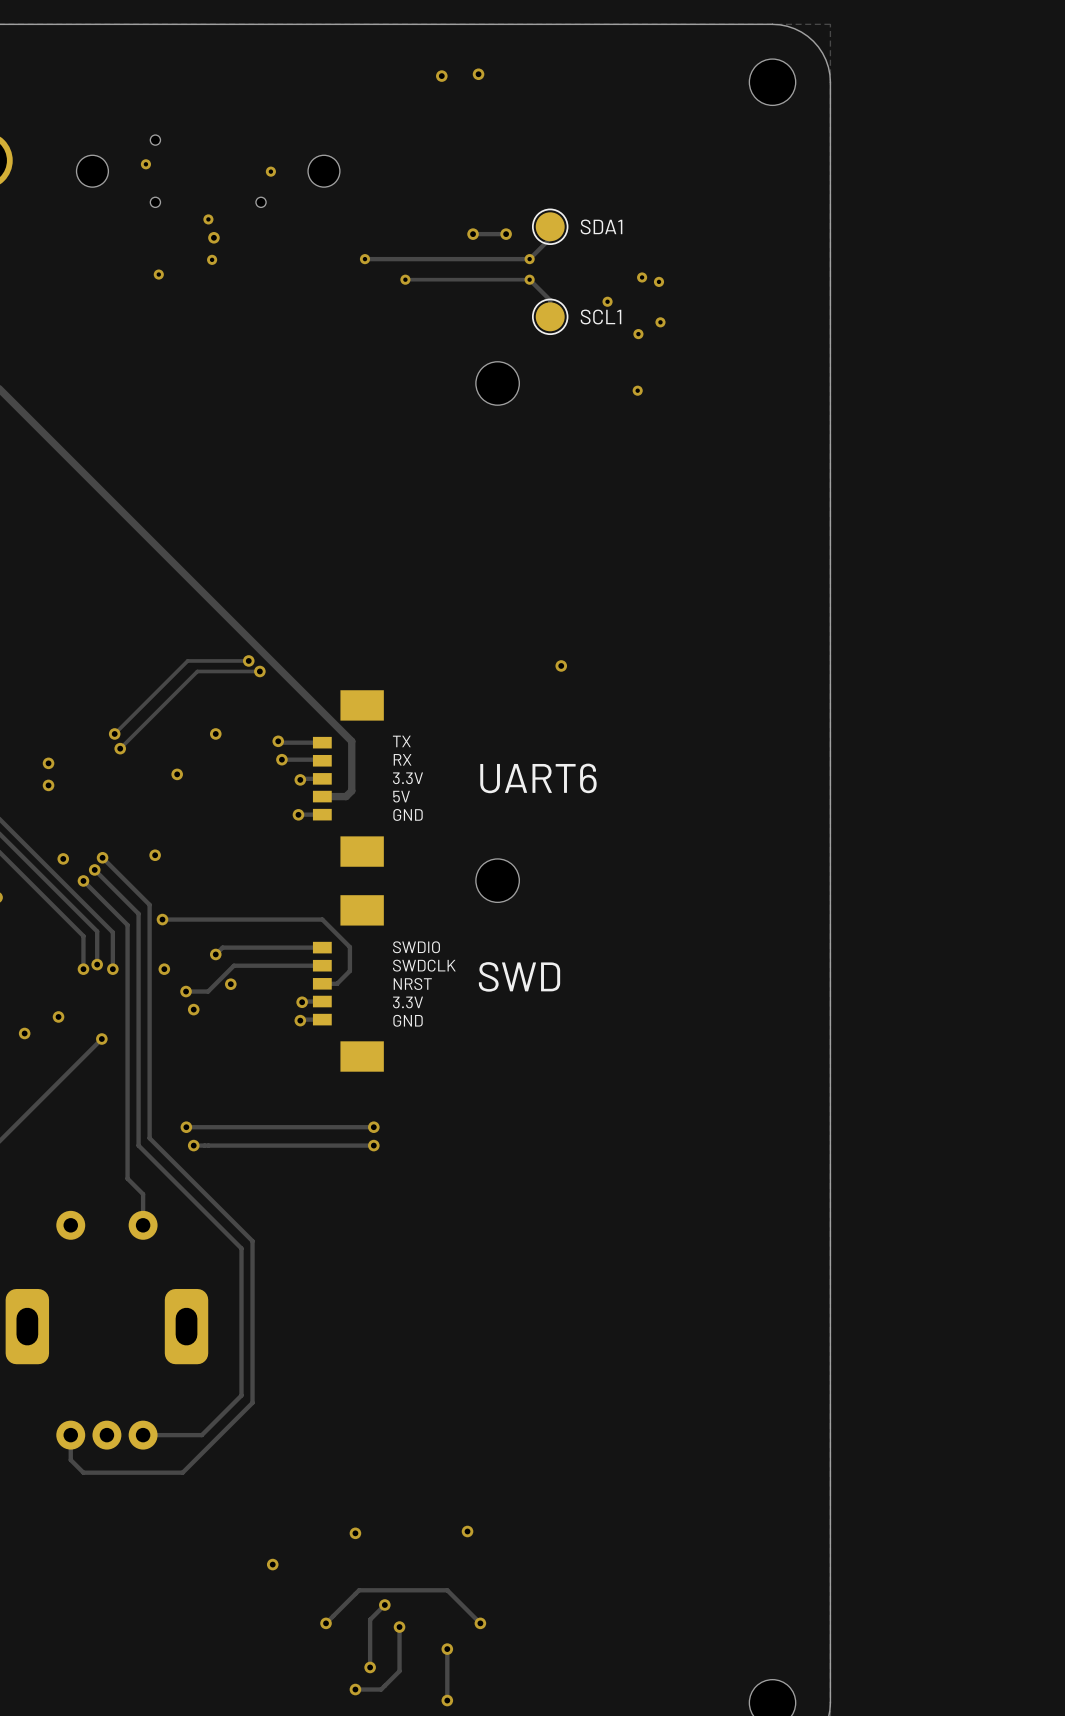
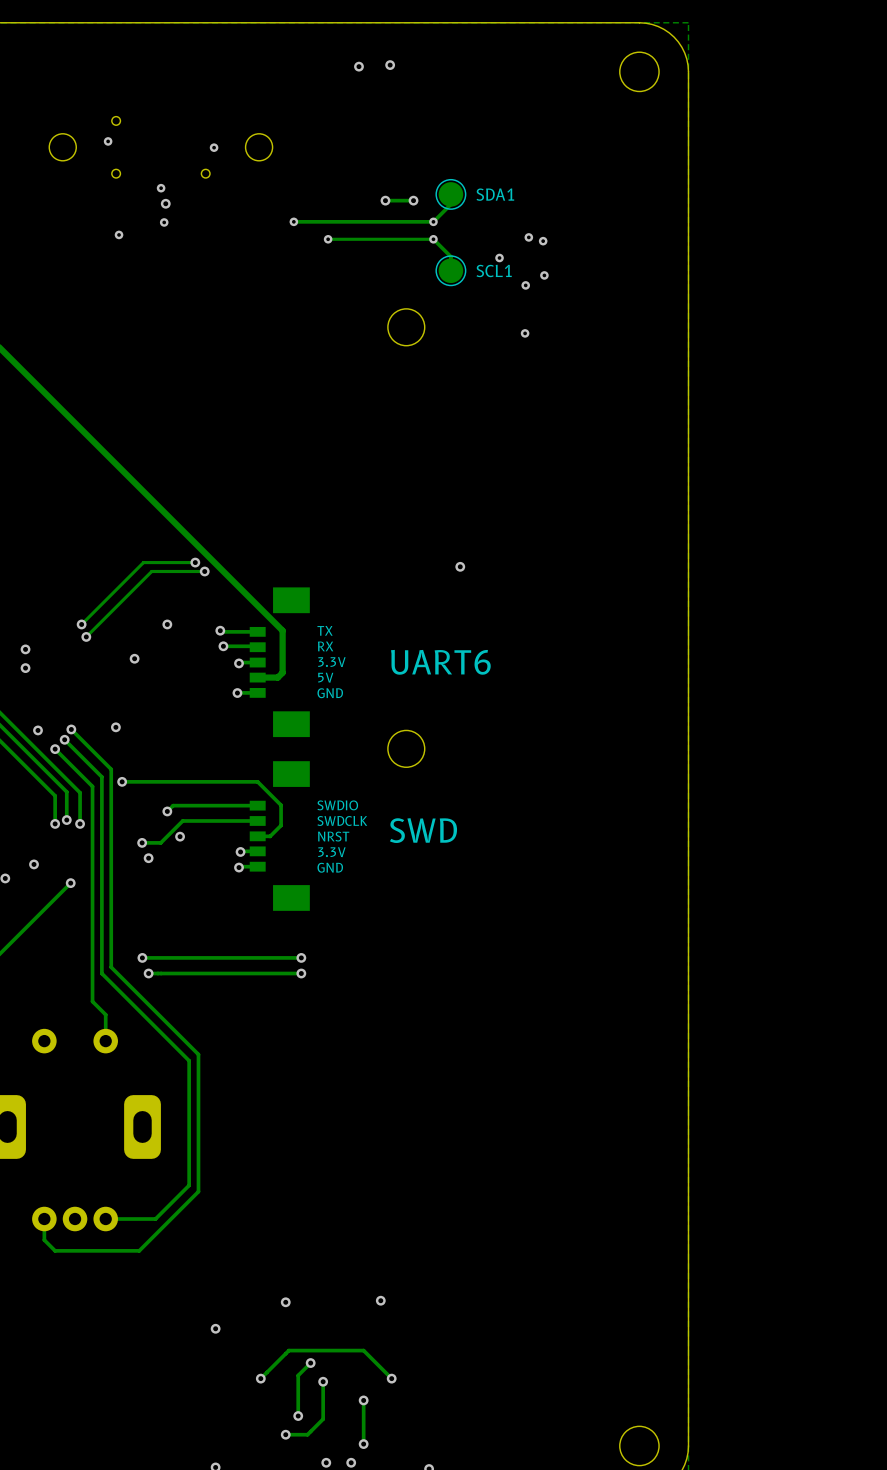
via: (164, 969) -> none

